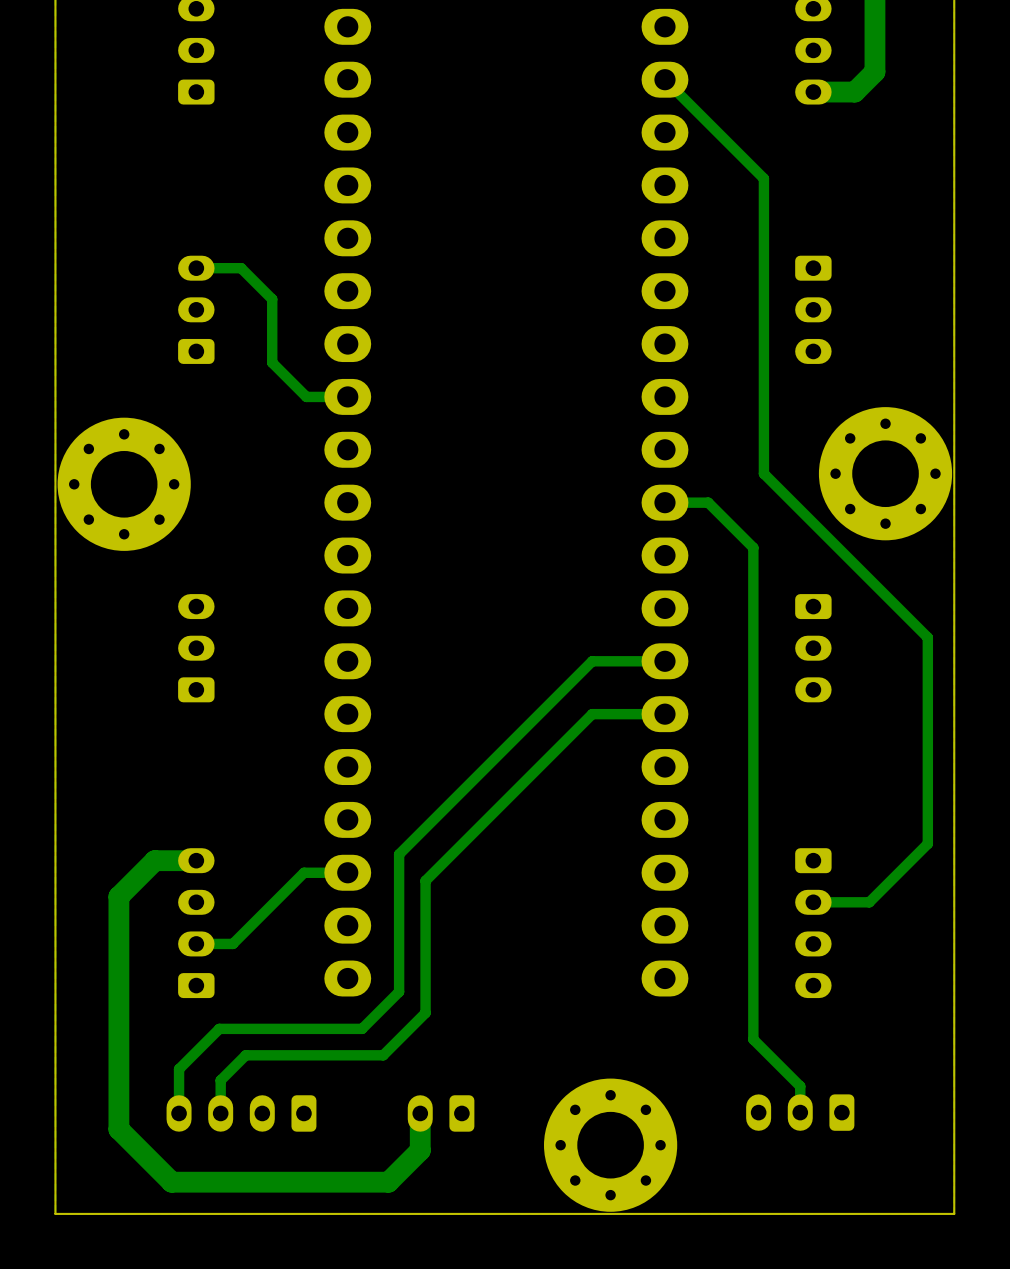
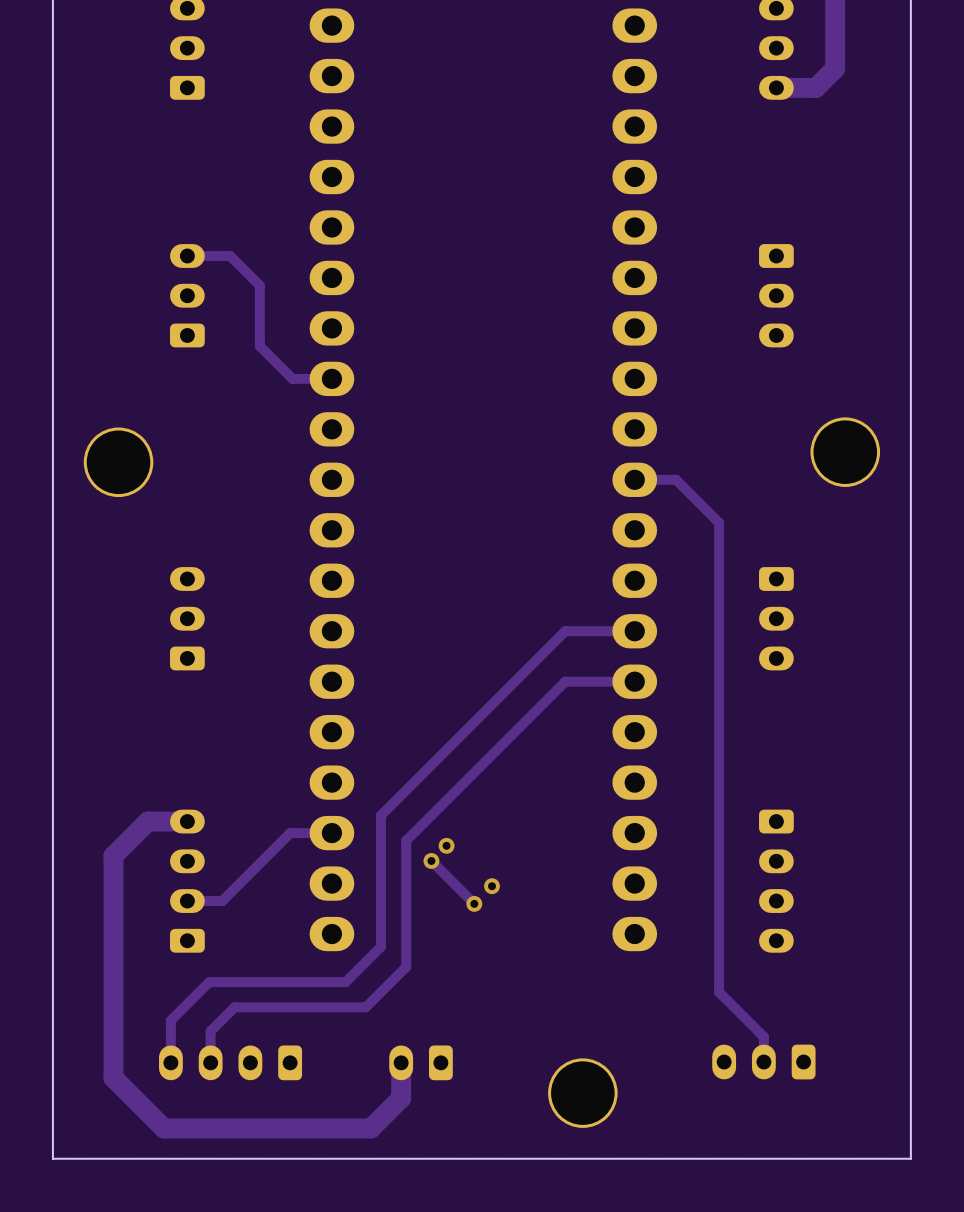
track: (664, 79) (763, 178) (763, 473) (927, 637) (927, 843) (869, 902) (813, 902) -> none
part footprint: [818, 407, 953, 541] -> [810, 417, 881, 487]
part footprint: [57, 417, 191, 551] -> [83, 427, 154, 498]
via: none -> (446, 845)
track: none -> (431, 860) (474, 903)
via: none -> (431, 860)
via: none -> (492, 886)
via: none -> (474, 903)
part footprint: [543, 1078, 678, 1212] -> [548, 1058, 618, 1128]

